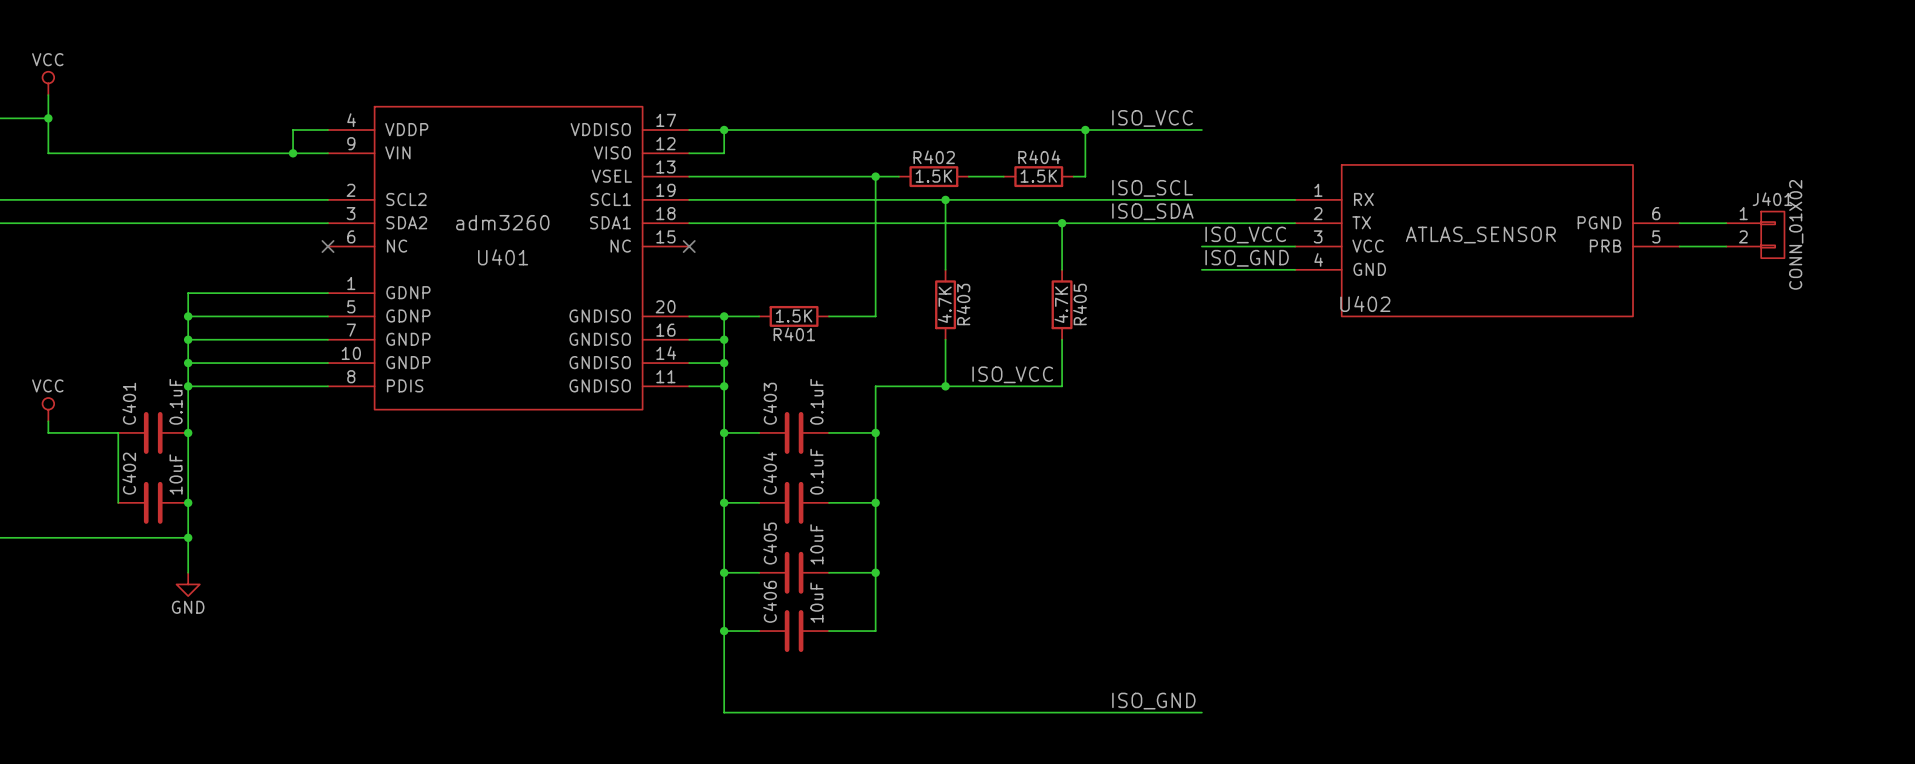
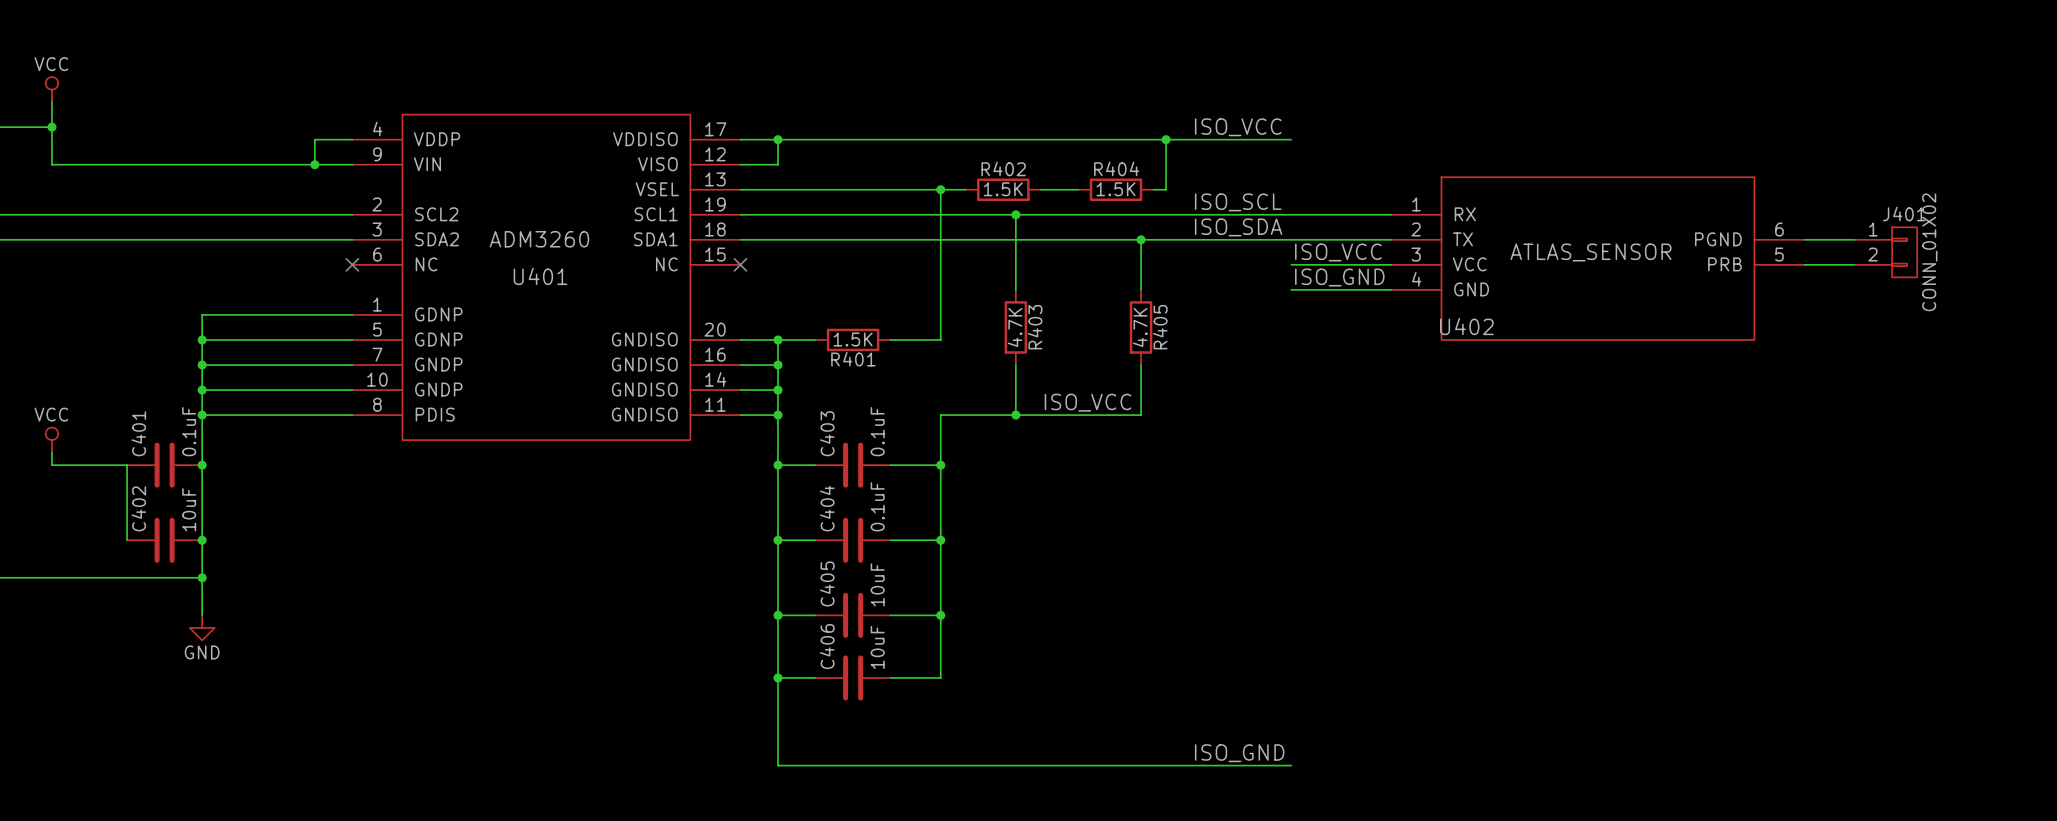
U401 value: adm3260 (502, 222) -> ADM3260 (539, 239)

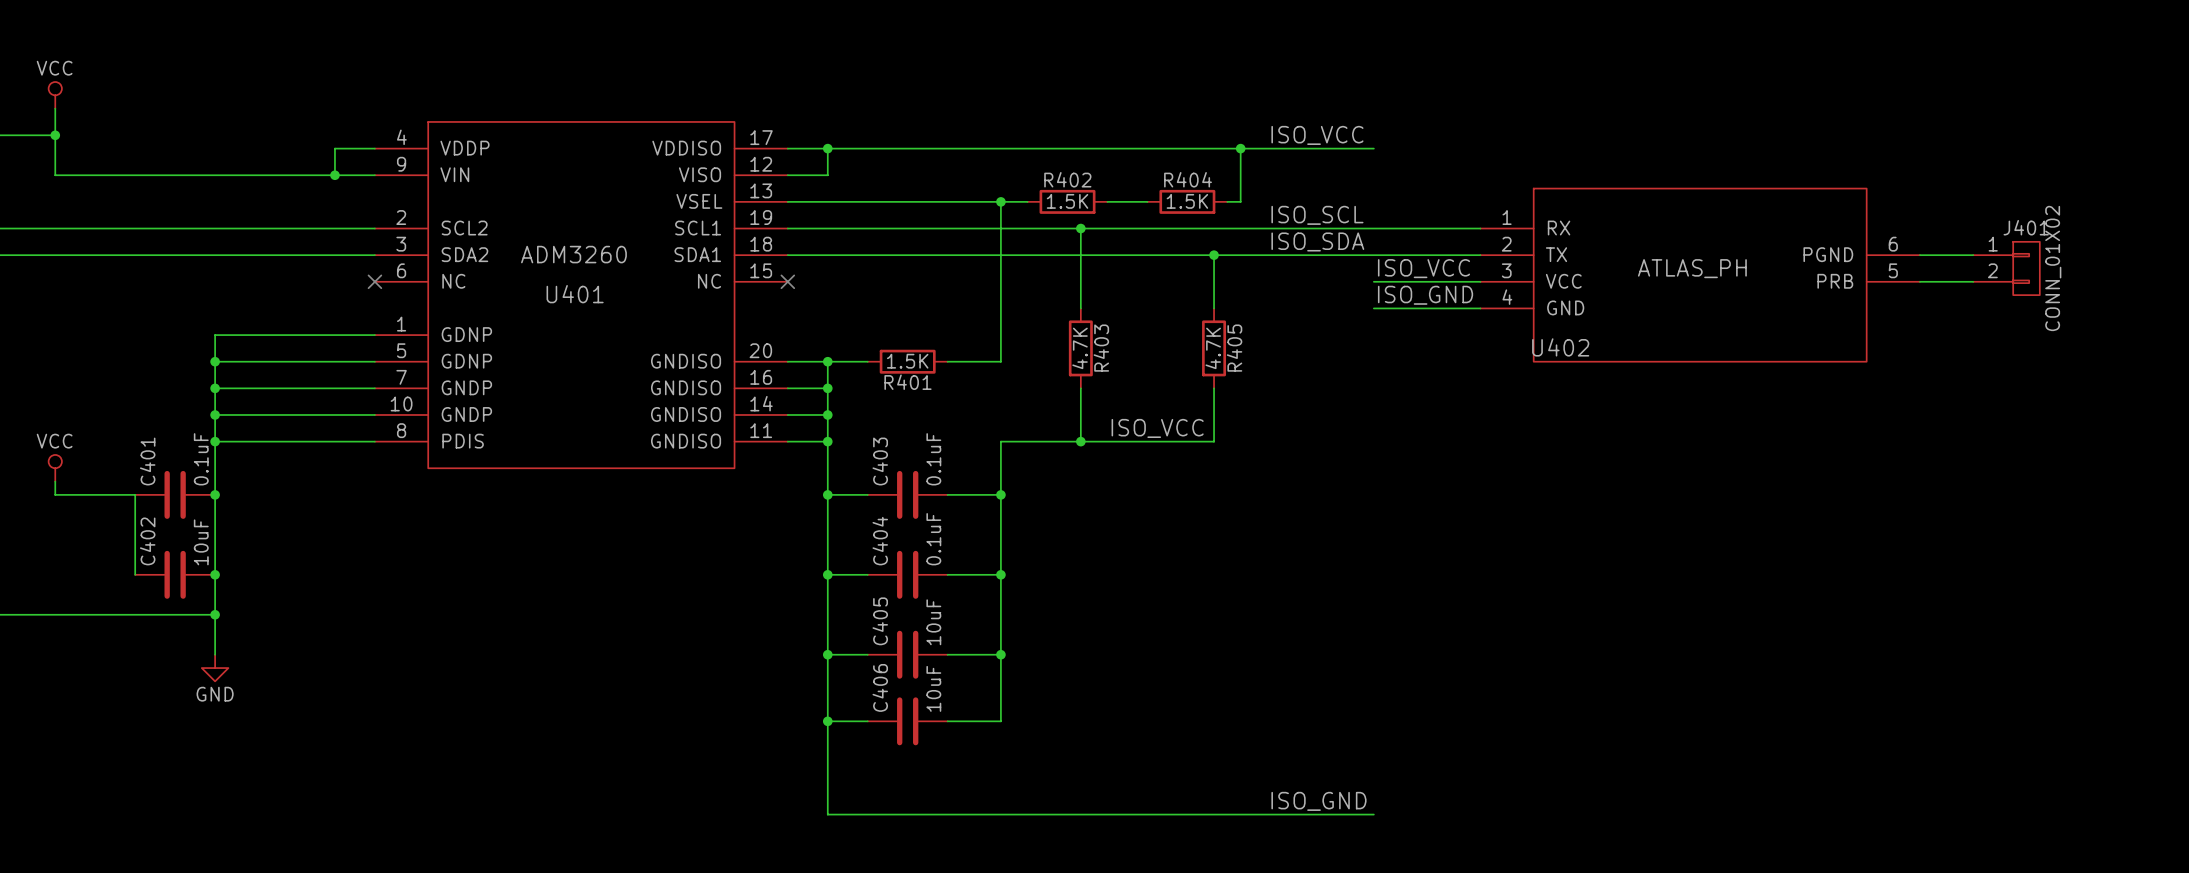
U402 value: ATLAS_SENSOR (1590, 252) -> ATLAS_PH (1692, 268)

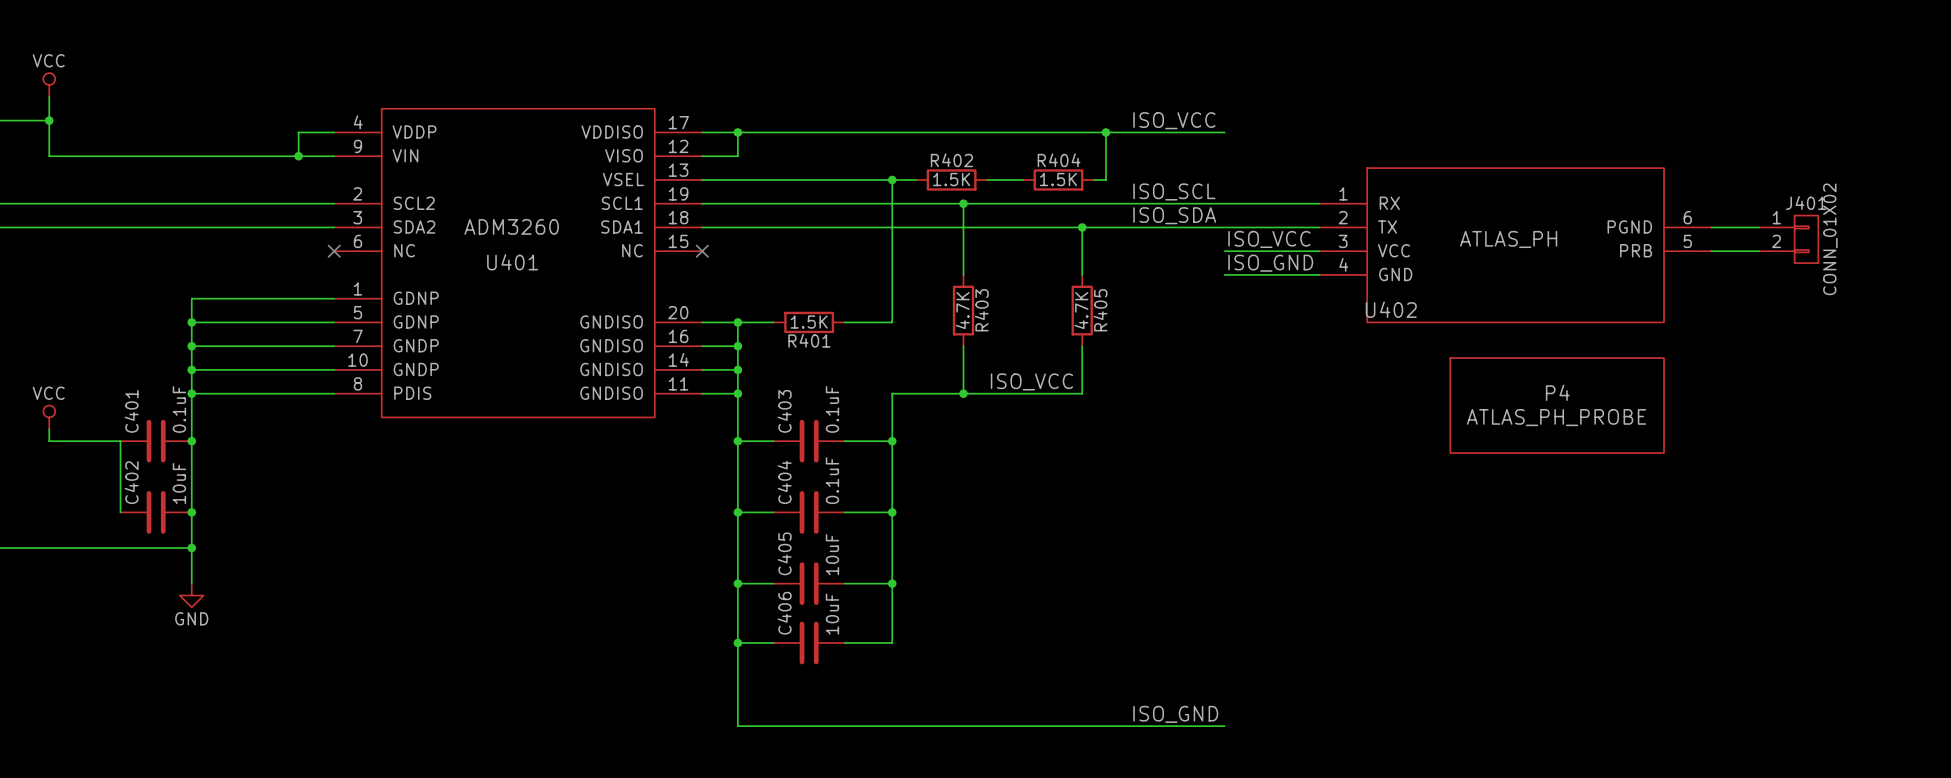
P4: none -> ATLAS_PH_PROBE (1557, 405)

